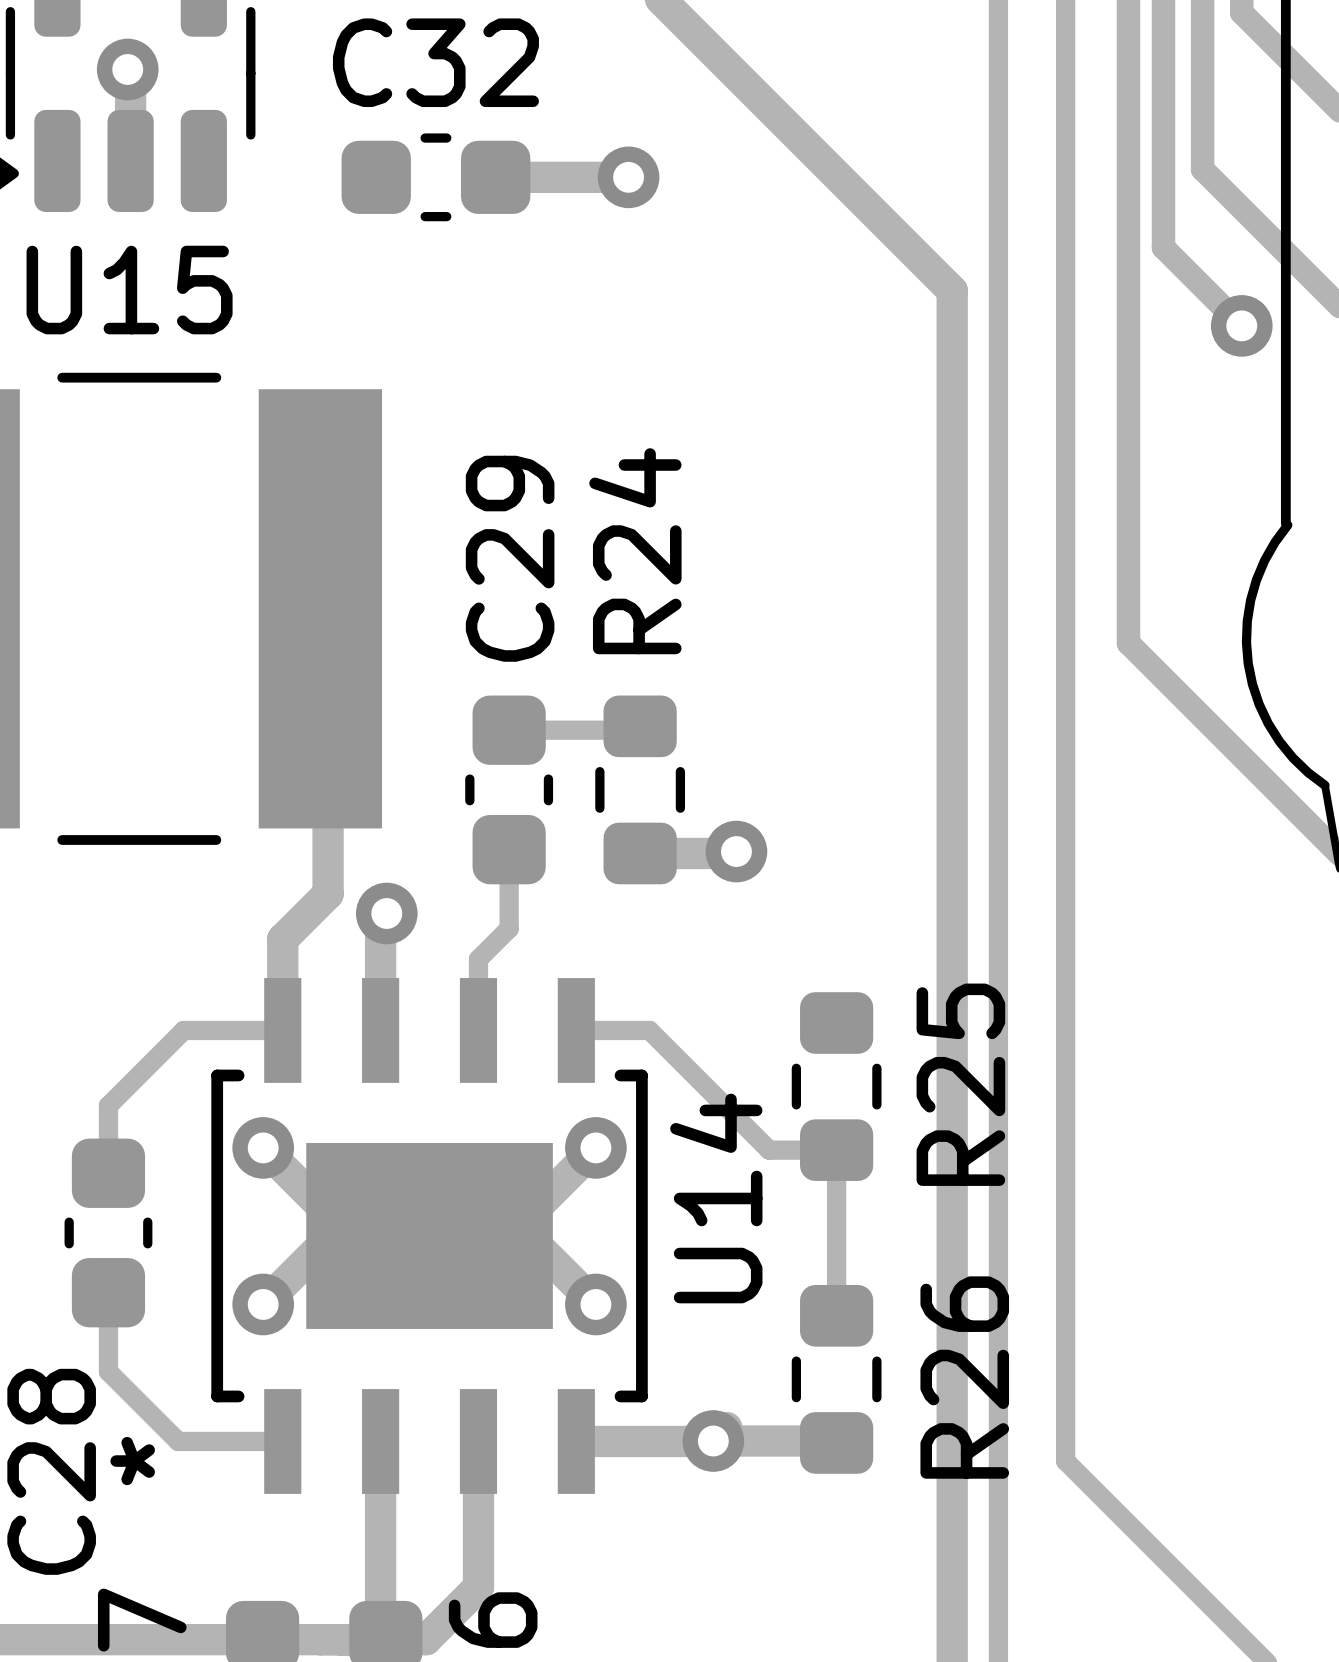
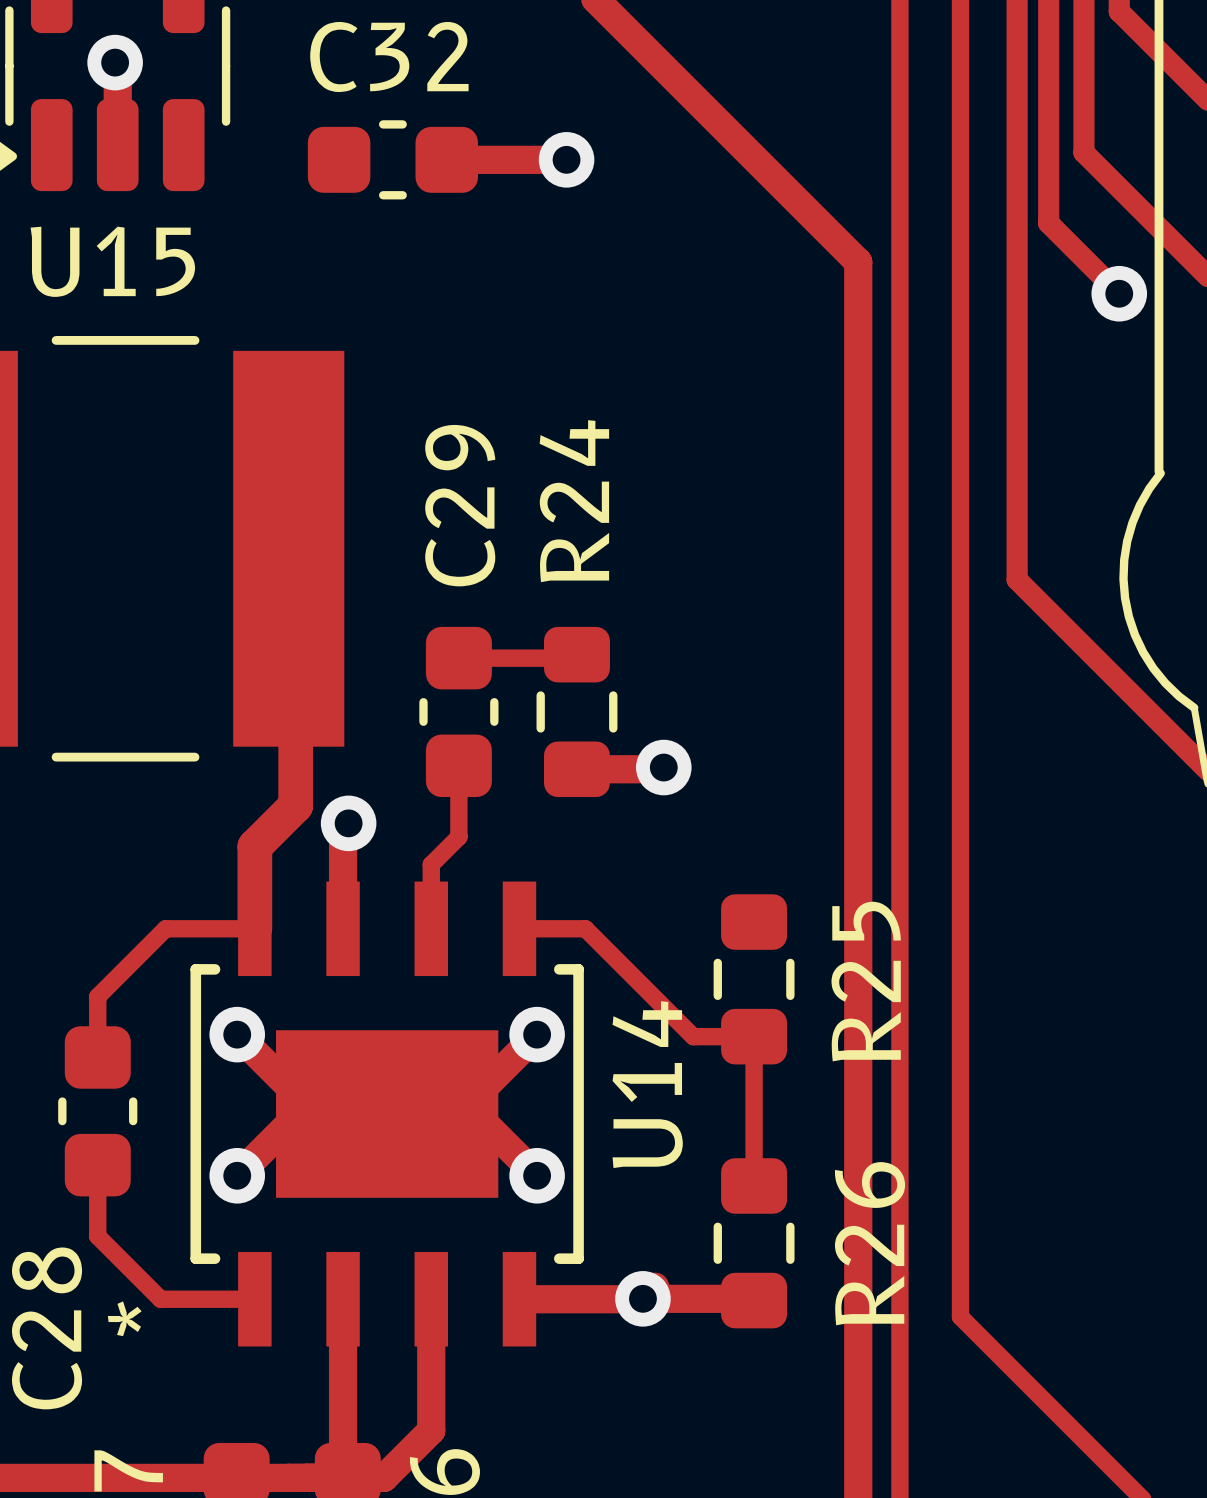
track width: thin (328, 658) (328, 893) (282, 939) (282, 1030) -> thick (295, 593) (295, 805) (254, 846) (254, 928)

